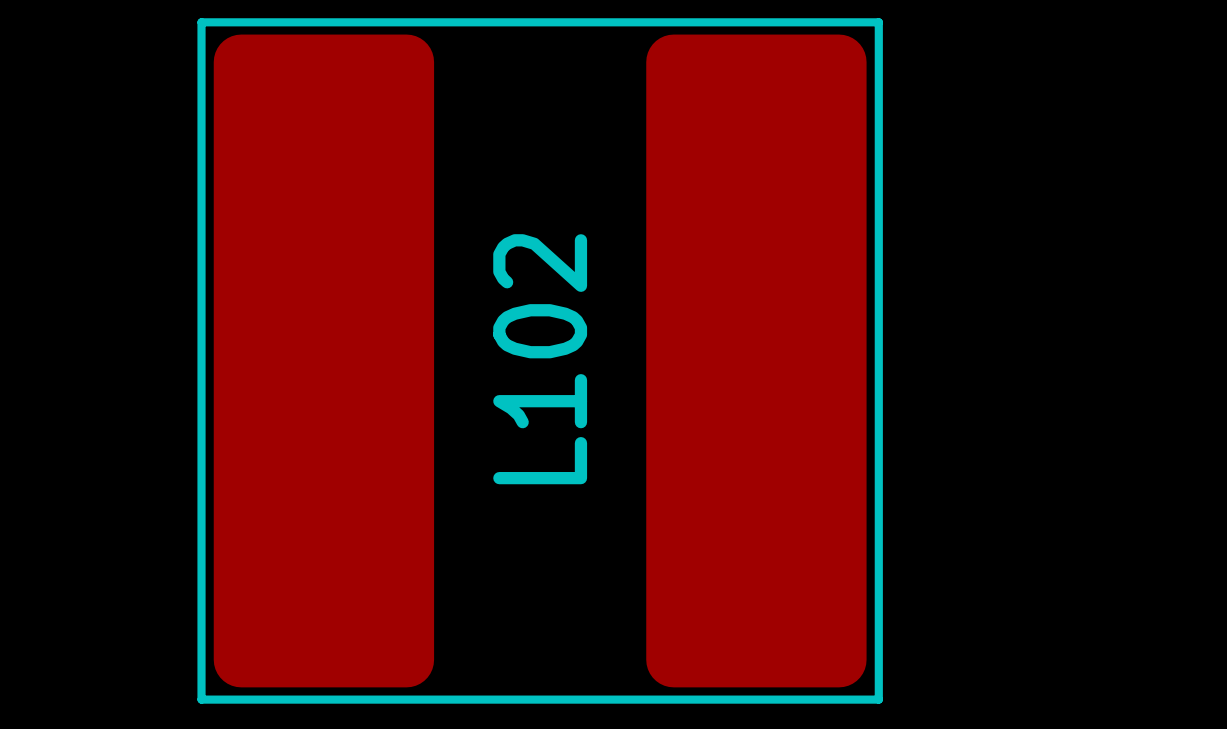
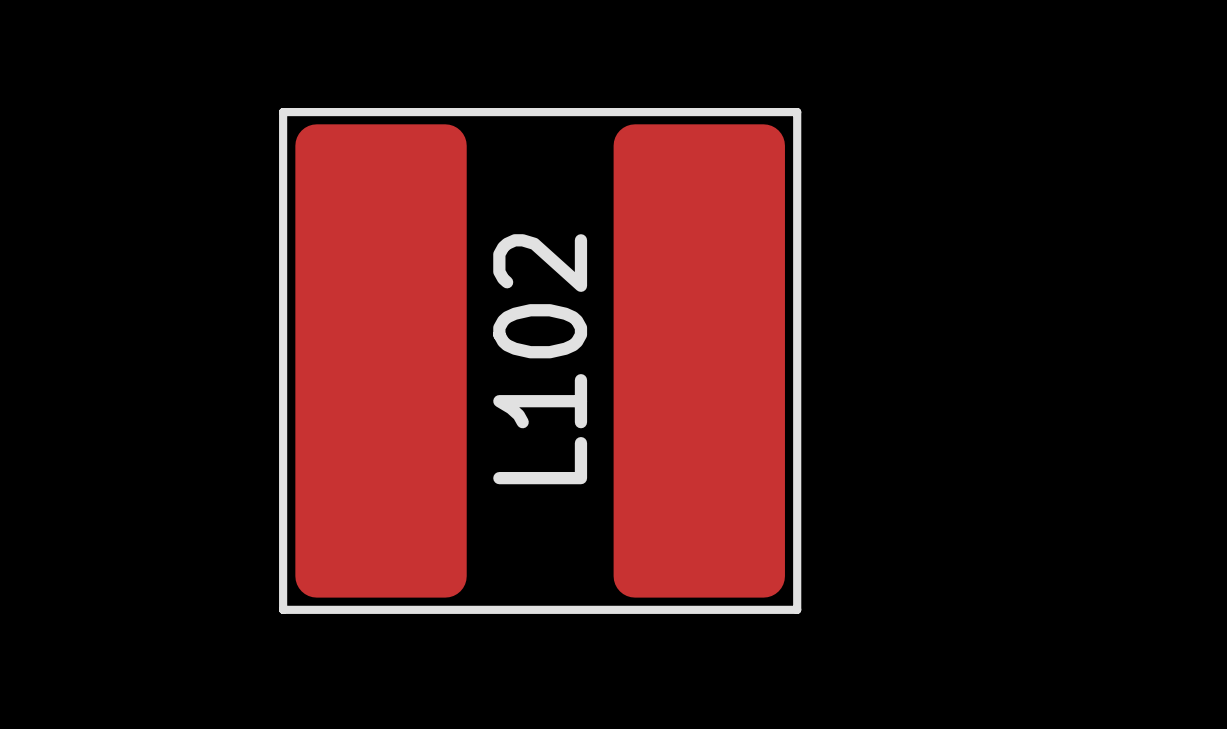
L102 footprint: [197, 18, 883, 704] -> [279, 108, 802, 614]

